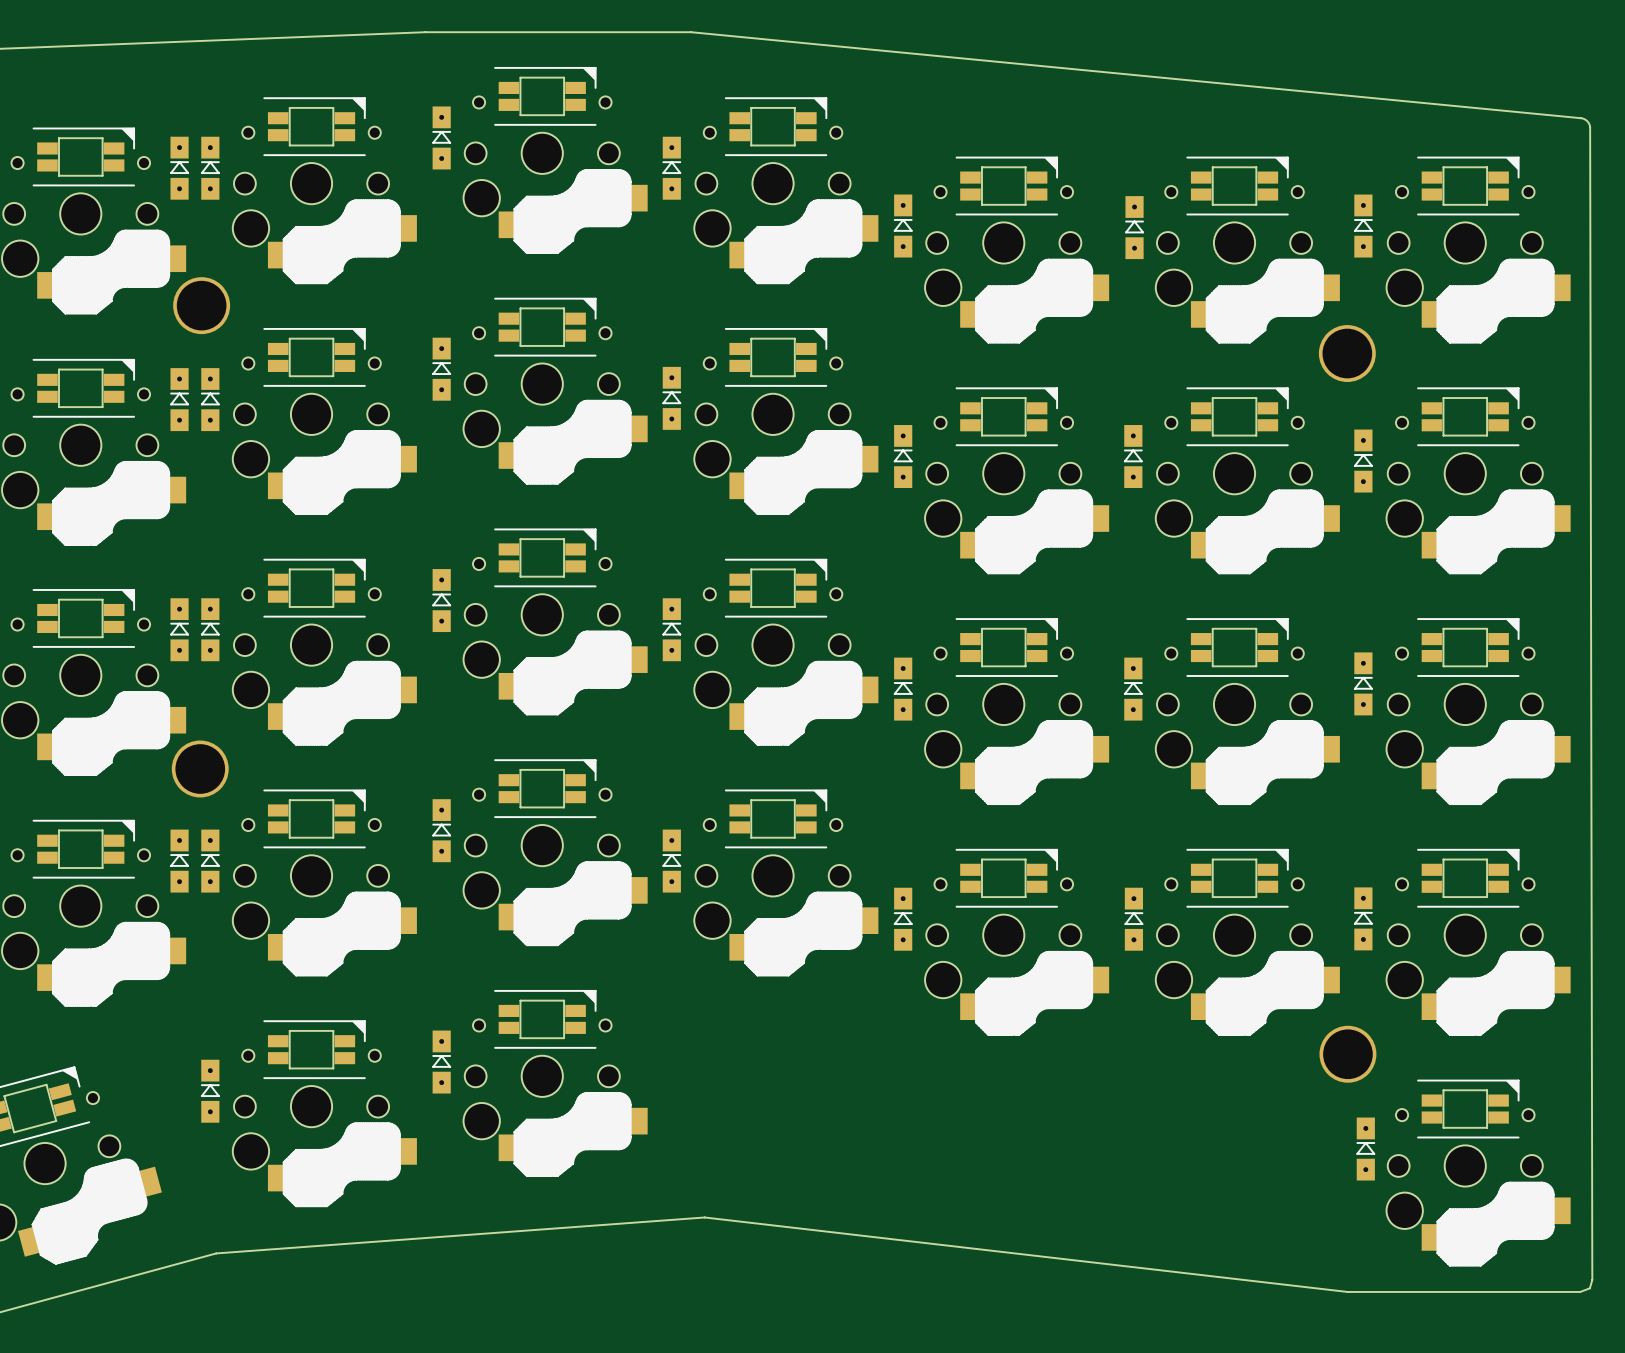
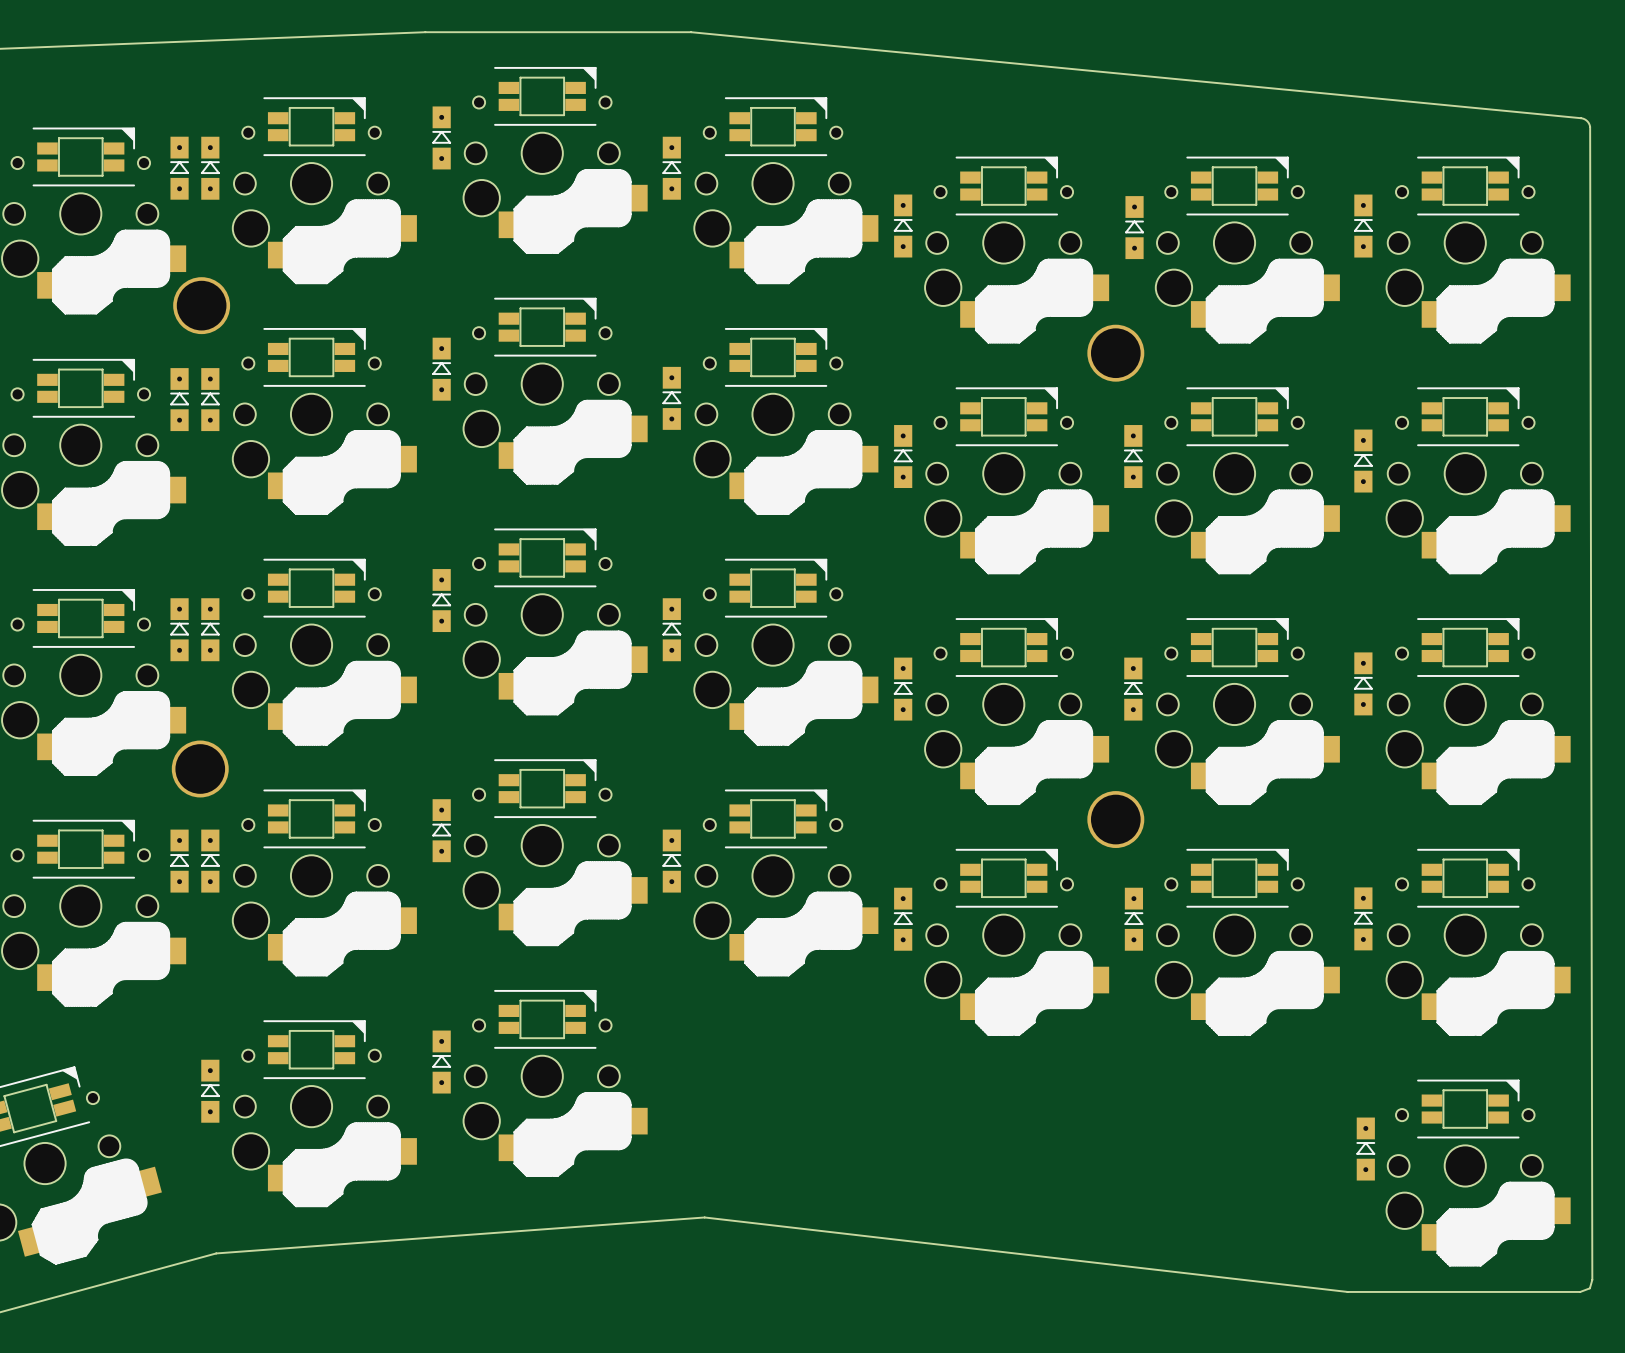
part position: (1347, 353) -> (1115, 353)
part: none -> (1115, 819)
part: (1347, 1054) -> none

